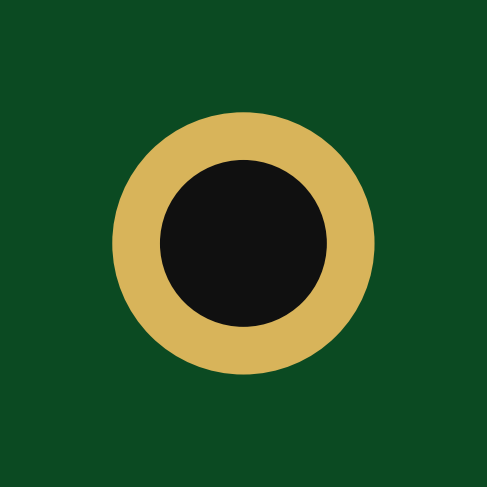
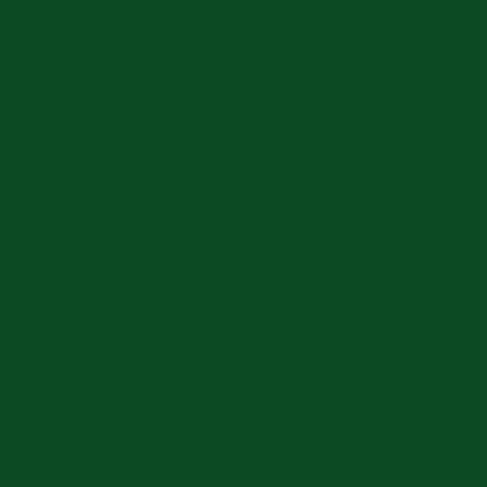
part: (243, 243) -> none

